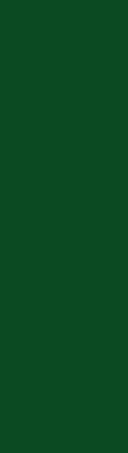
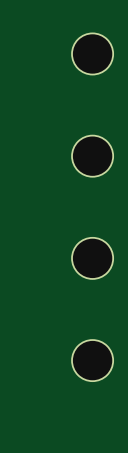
part: none -> (92, 53)
part: none -> (92, 156)
part: none -> (92, 258)
part: none -> (92, 360)

